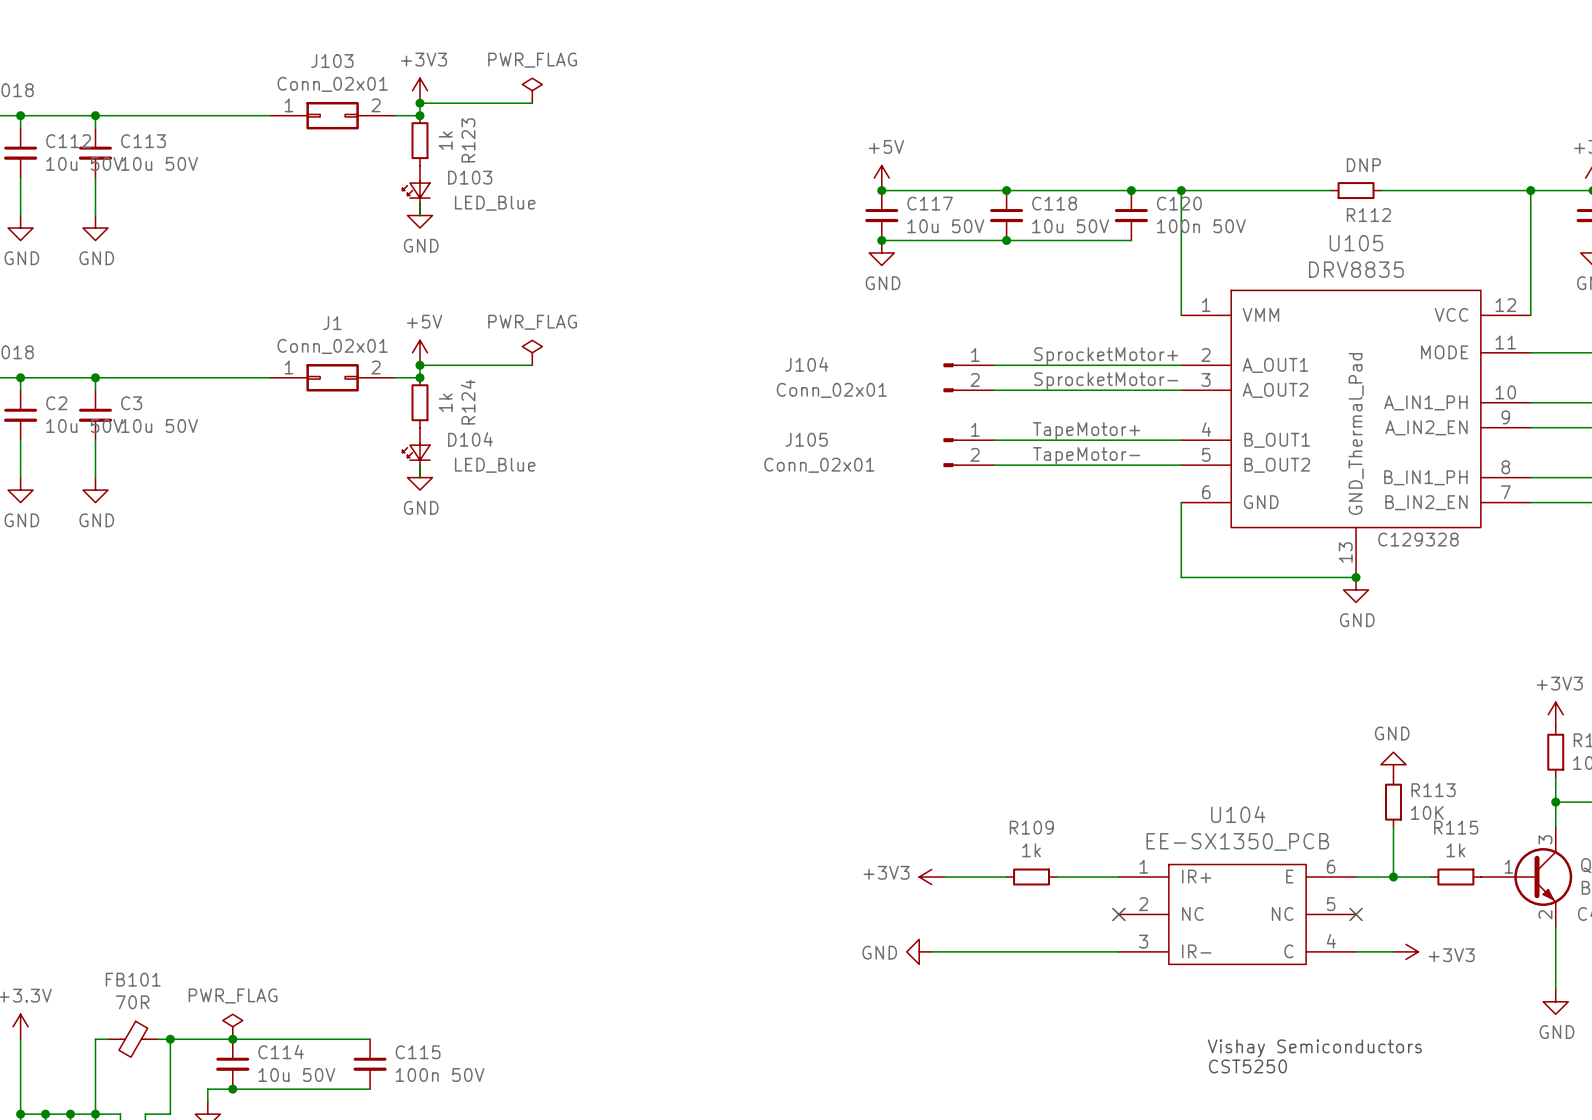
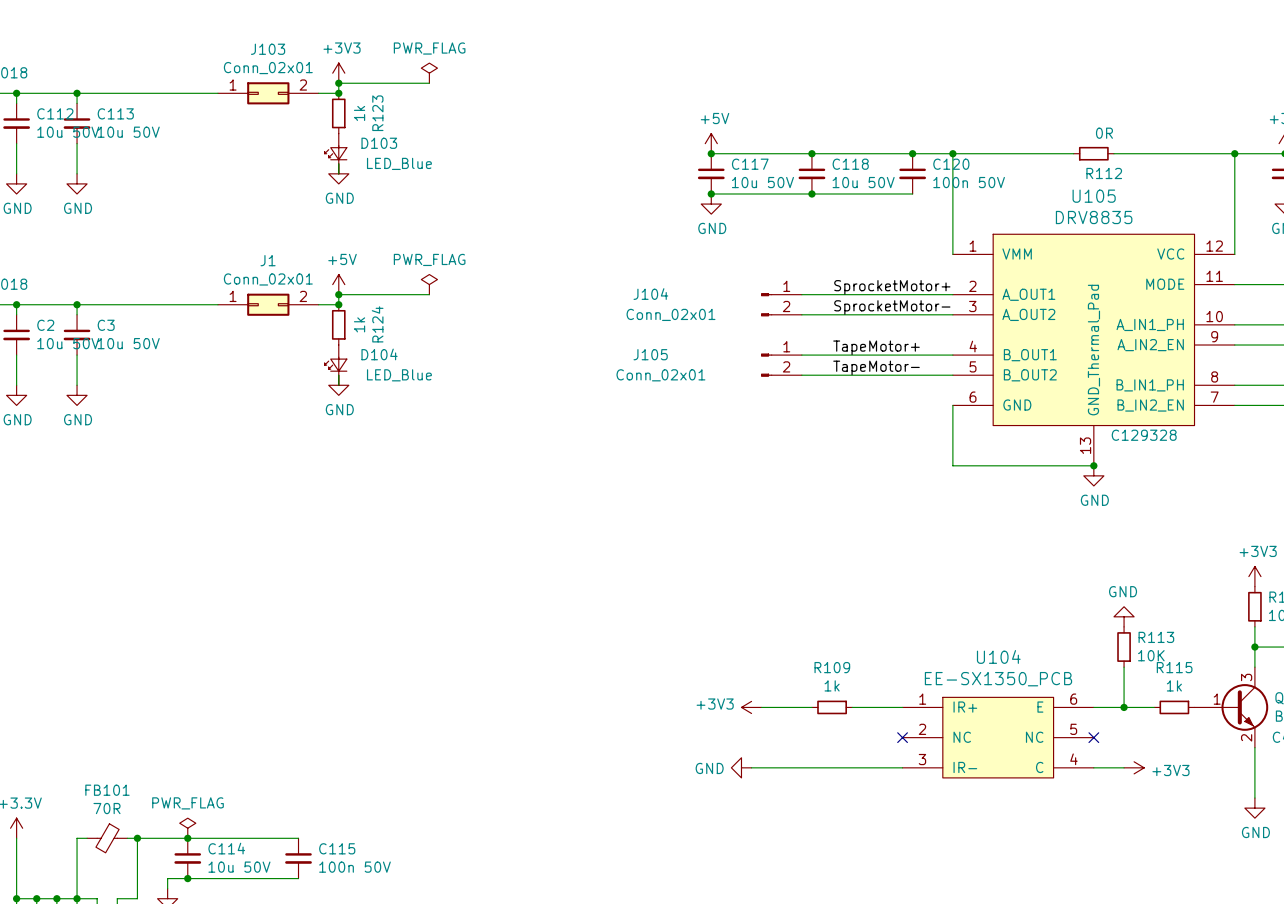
R112 value: DNP (1363, 165) -> 0R (1104, 133)
text: Vishay Semiconductors (1314, 1048) -> none
text: CST5250 (1247, 1066) -> none

